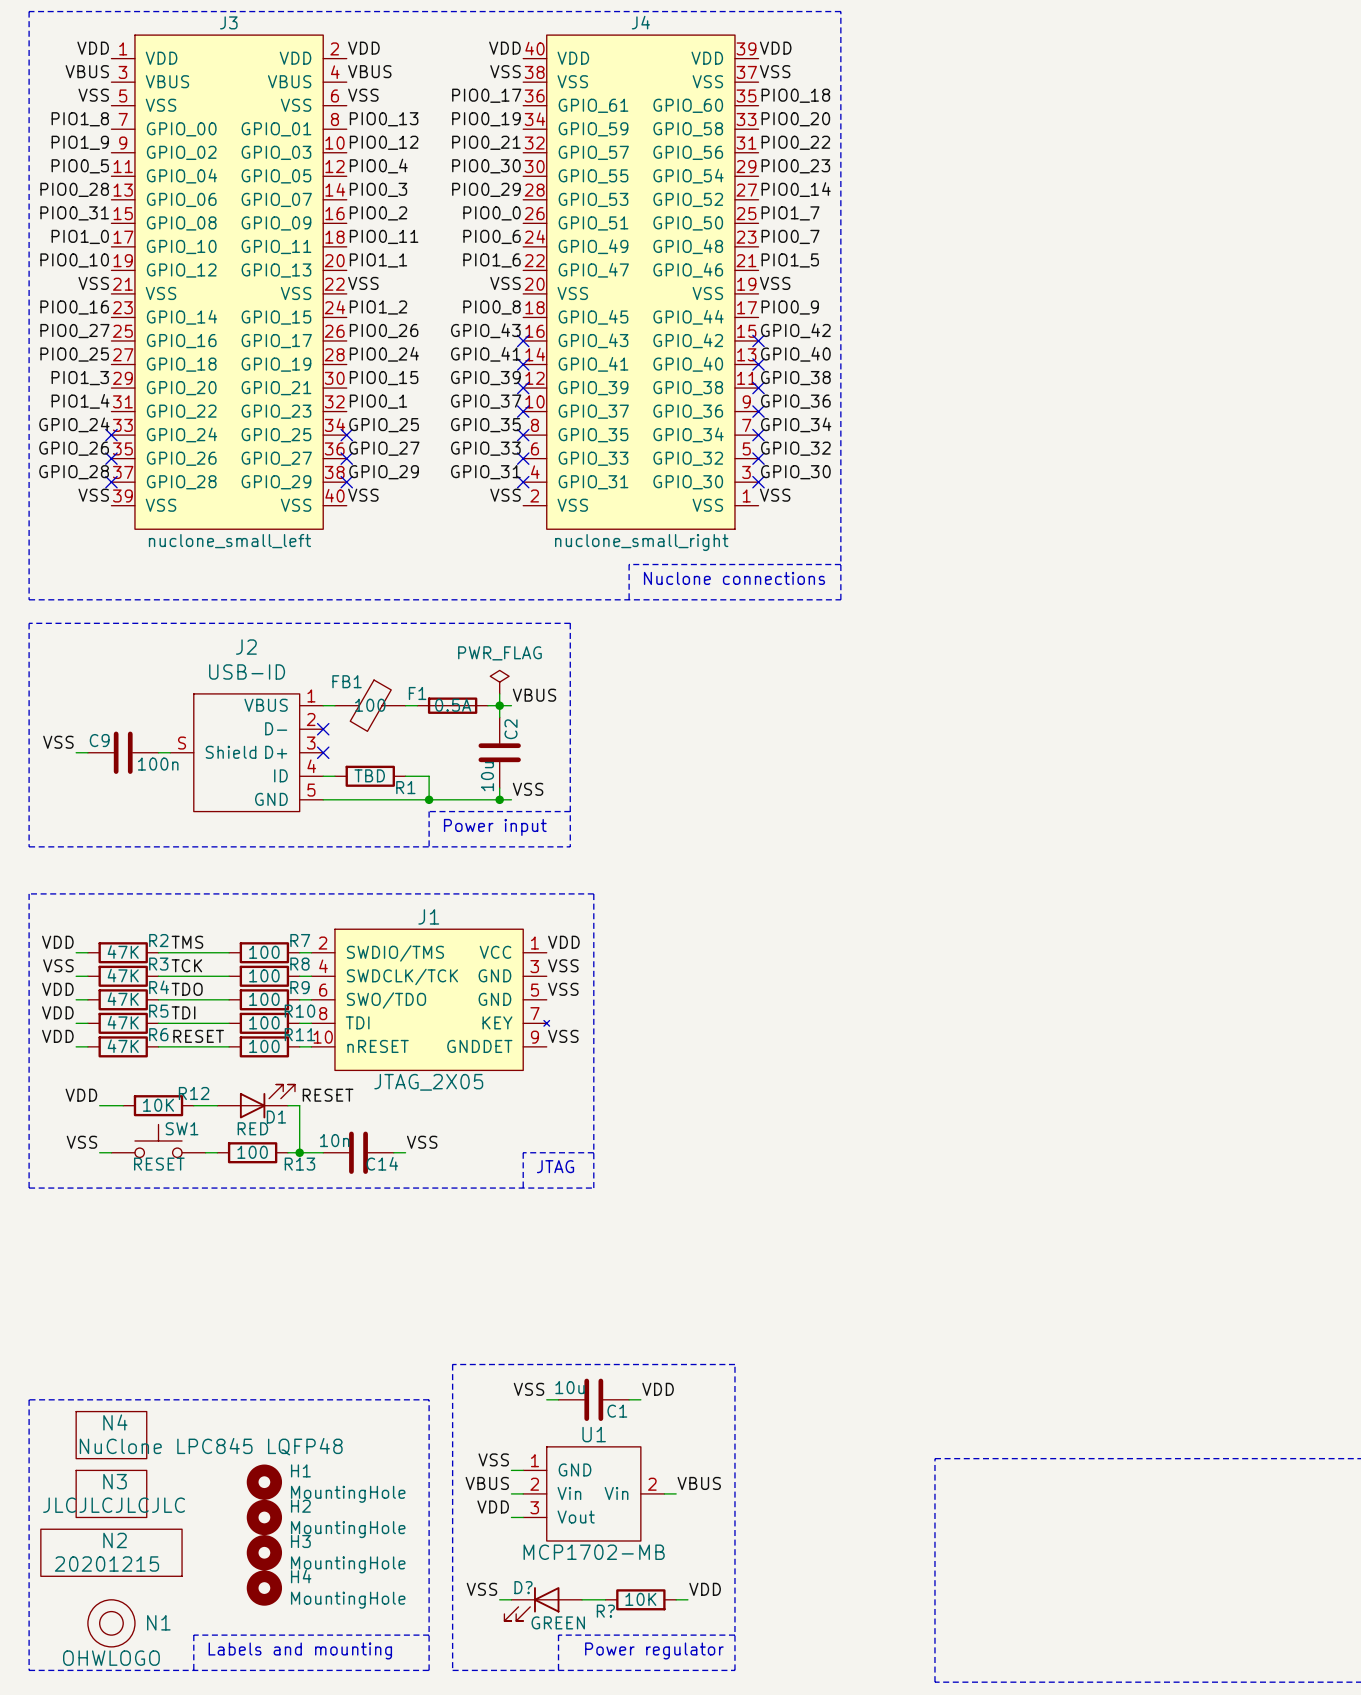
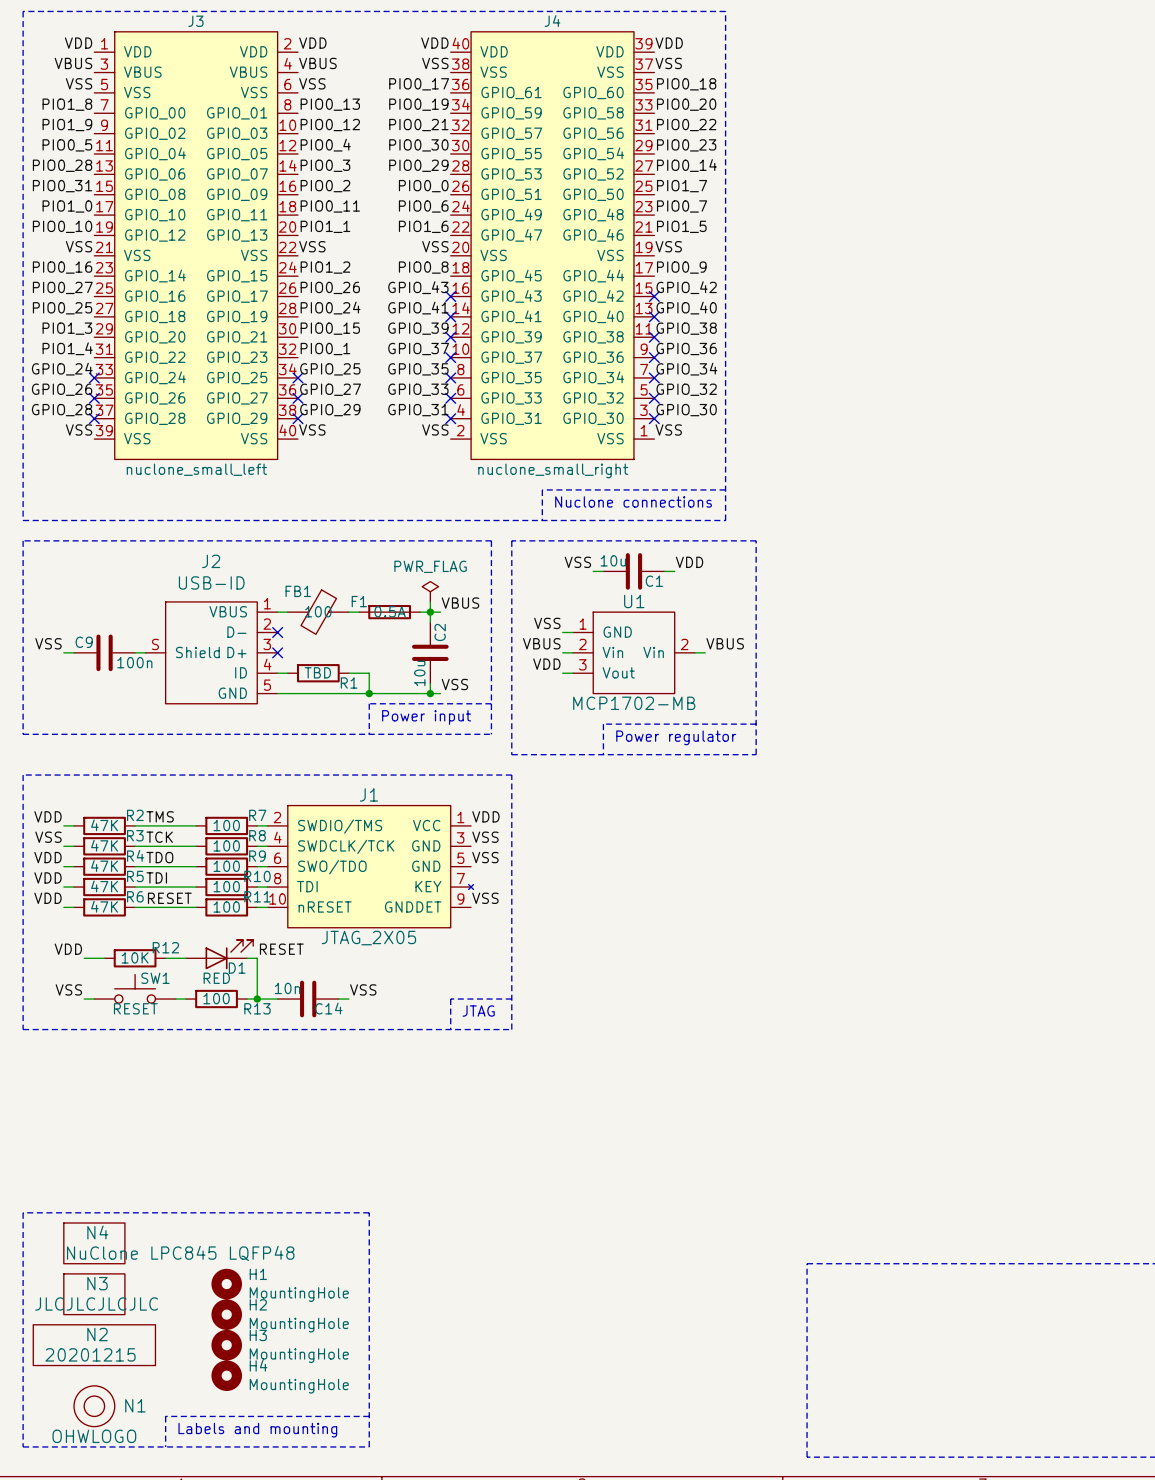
line: none -> (511, 540) (756, 540) (756, 754) (511, 754) (511, 540)
label: none -> VSS (577, 562)
label: none -> VDD (689, 562)
wire: none -> (593, 571) (603, 571)
wire: none -> (664, 571) (674, 571)
label: none -> VSS (547, 623)
wire: none -> (562, 632) (572, 632)
label: none -> VBUS (541, 643)
label: none -> VBUS (725, 643)
wire: none -> (562, 652) (572, 652)
wire: none -> (695, 652) (705, 652)
label: none -> VDD (546, 664)
wire: none -> (562, 673) (572, 673)
line: none -> (756, 724) (603, 724) (603, 754)
text: none -> Power regulator (676, 737)
line: (452, 1364) (734, 1364) (734, 1670) (452, 1670) (452, 1364) -> none
label: VSS (529, 1389) -> none
label: VDD (658, 1389) -> none
wire: (546, 1399) (558, 1399) -> none
C1 position: (593, 1399) -> (633, 571)
wire: (629, 1399) (640, 1399) -> none
label: VSS (493, 1459) -> none
wire: (511, 1470) (523, 1470) -> none
label: VBUS (487, 1483) -> none
label: VBUS (699, 1483) -> none
wire: (511, 1493) (523, 1493) -> none
U1 position: (593, 1493) -> (633, 652)
wire: (664, 1493) (676, 1493) -> none
label: VDD (493, 1506) -> none
wire: (511, 1517) (523, 1517) -> none
label: VSS (481, 1589) -> none
label: VDD (705, 1589) -> none
wire: (499, 1599) (511, 1599) -> none
wire: (582, 1599) (605, 1599) -> none
R?: 10K (640, 1599) -> none
wire: (676, 1599) (687, 1599) -> none
D?: GREEN (543, 1604) -> none
line: (734, 1635) (558, 1635) (558, 1670) -> none
text: Power regulator (654, 1650) -> none

